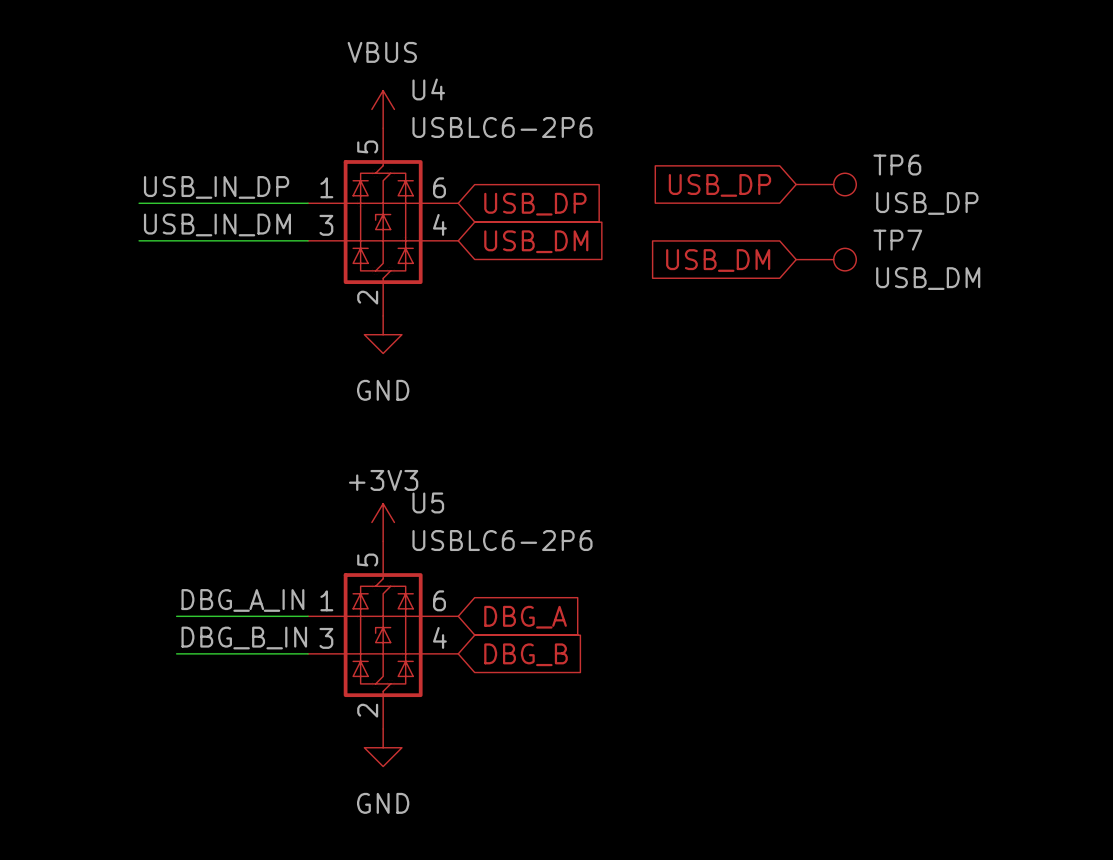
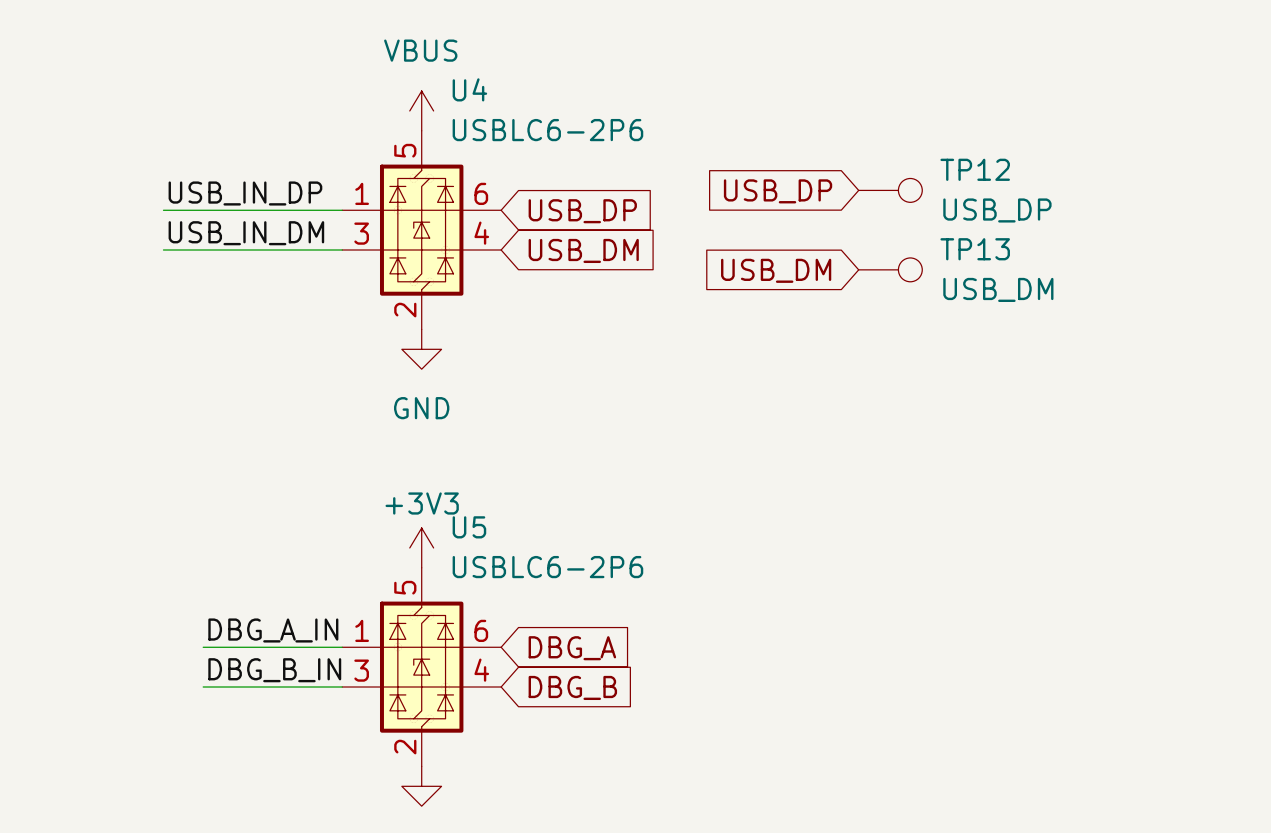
TP6 name: TP6 (897, 165) -> TP12 (975, 169)
TP7 name: TP7 (897, 240) -> TP13 (975, 249)

